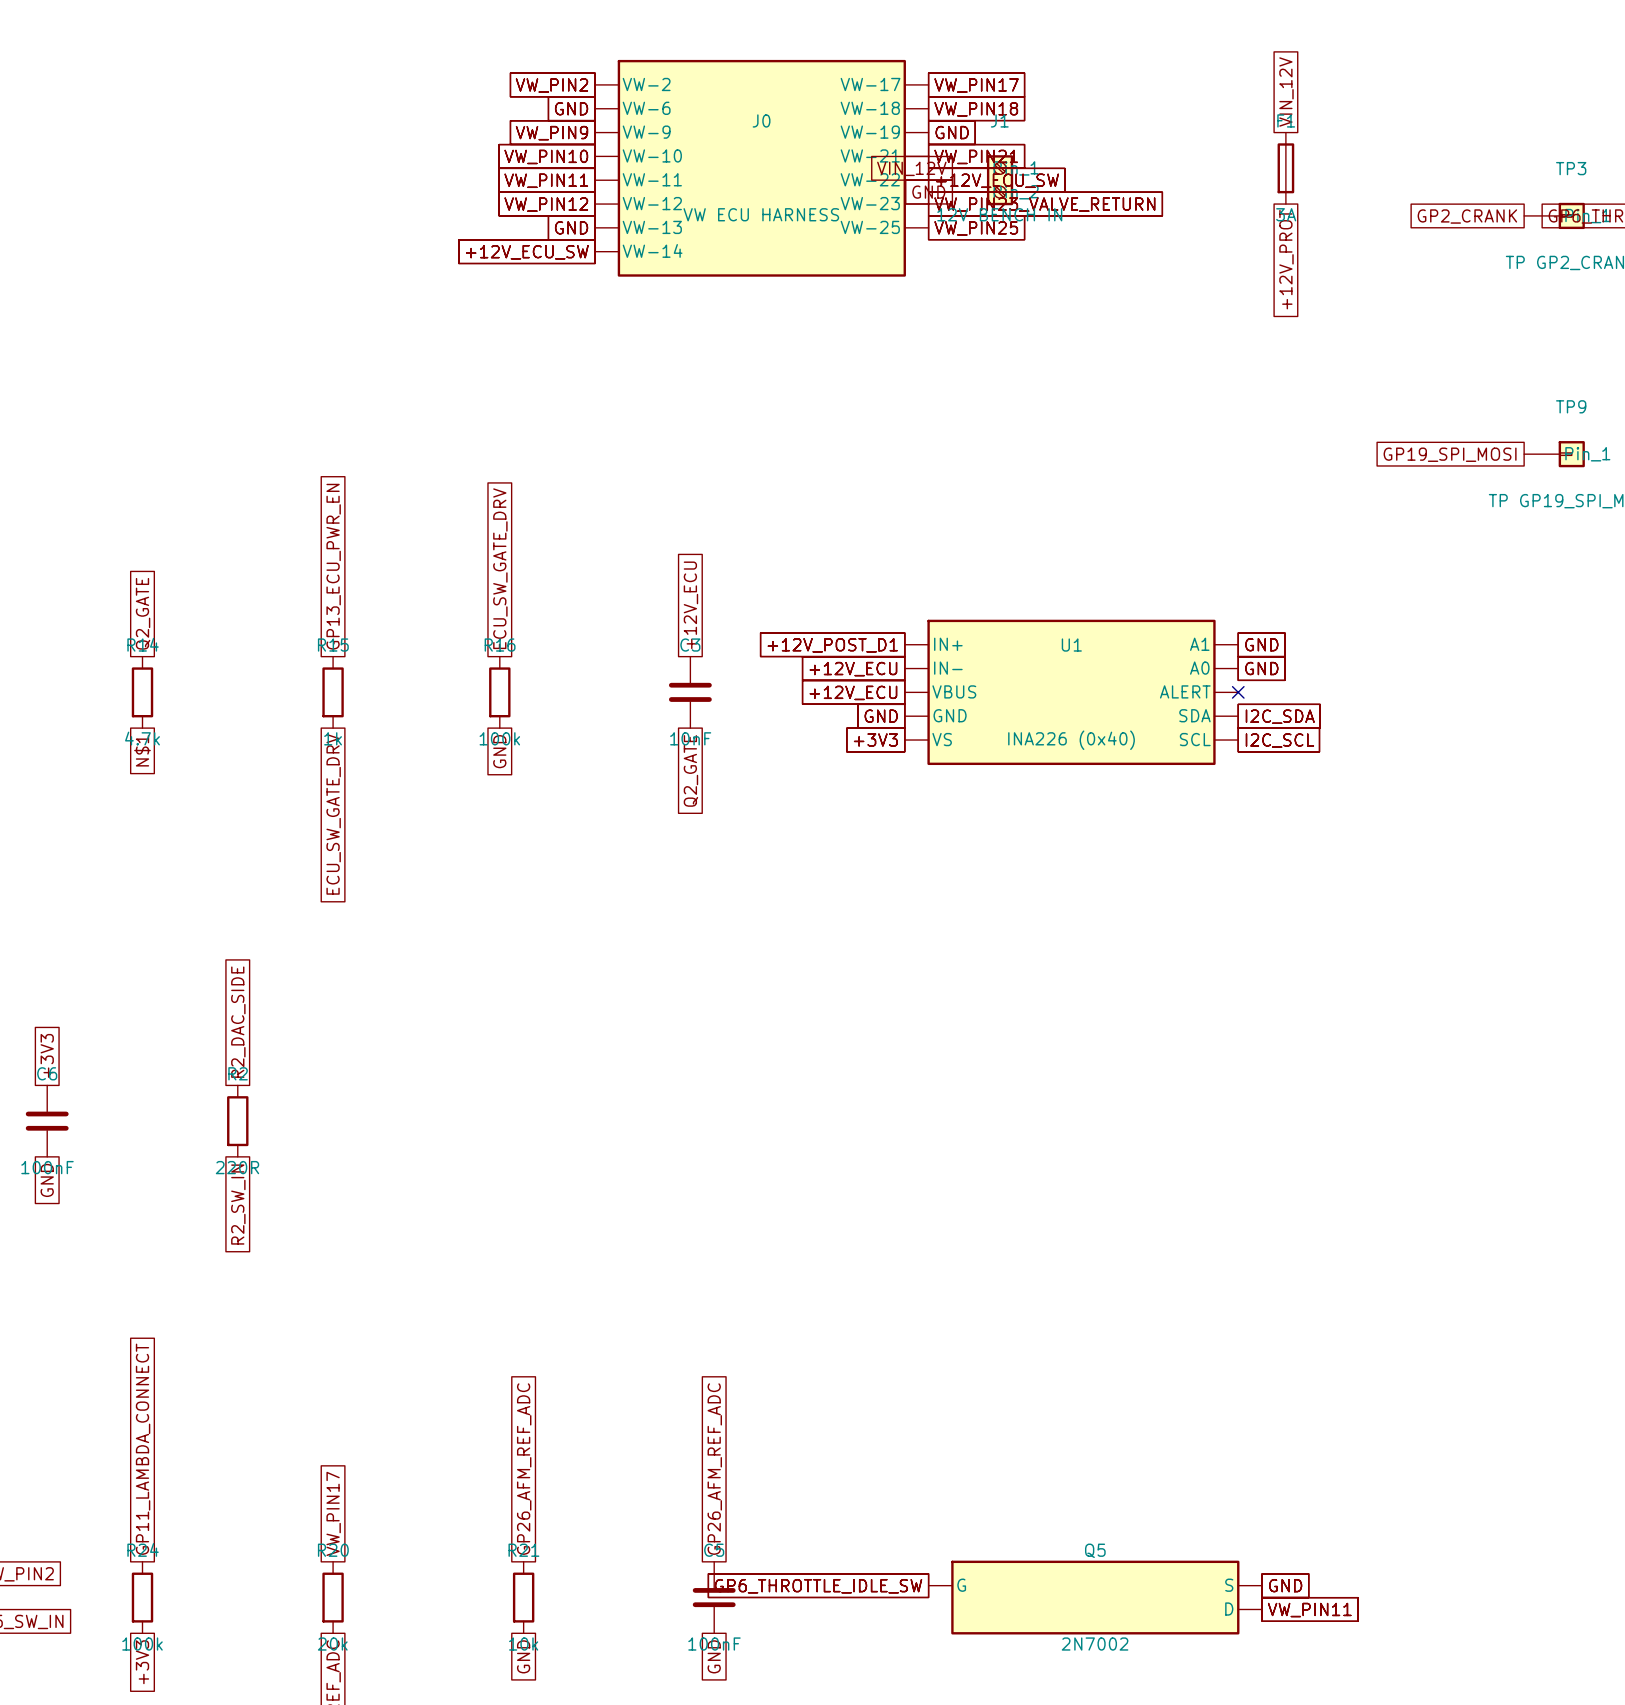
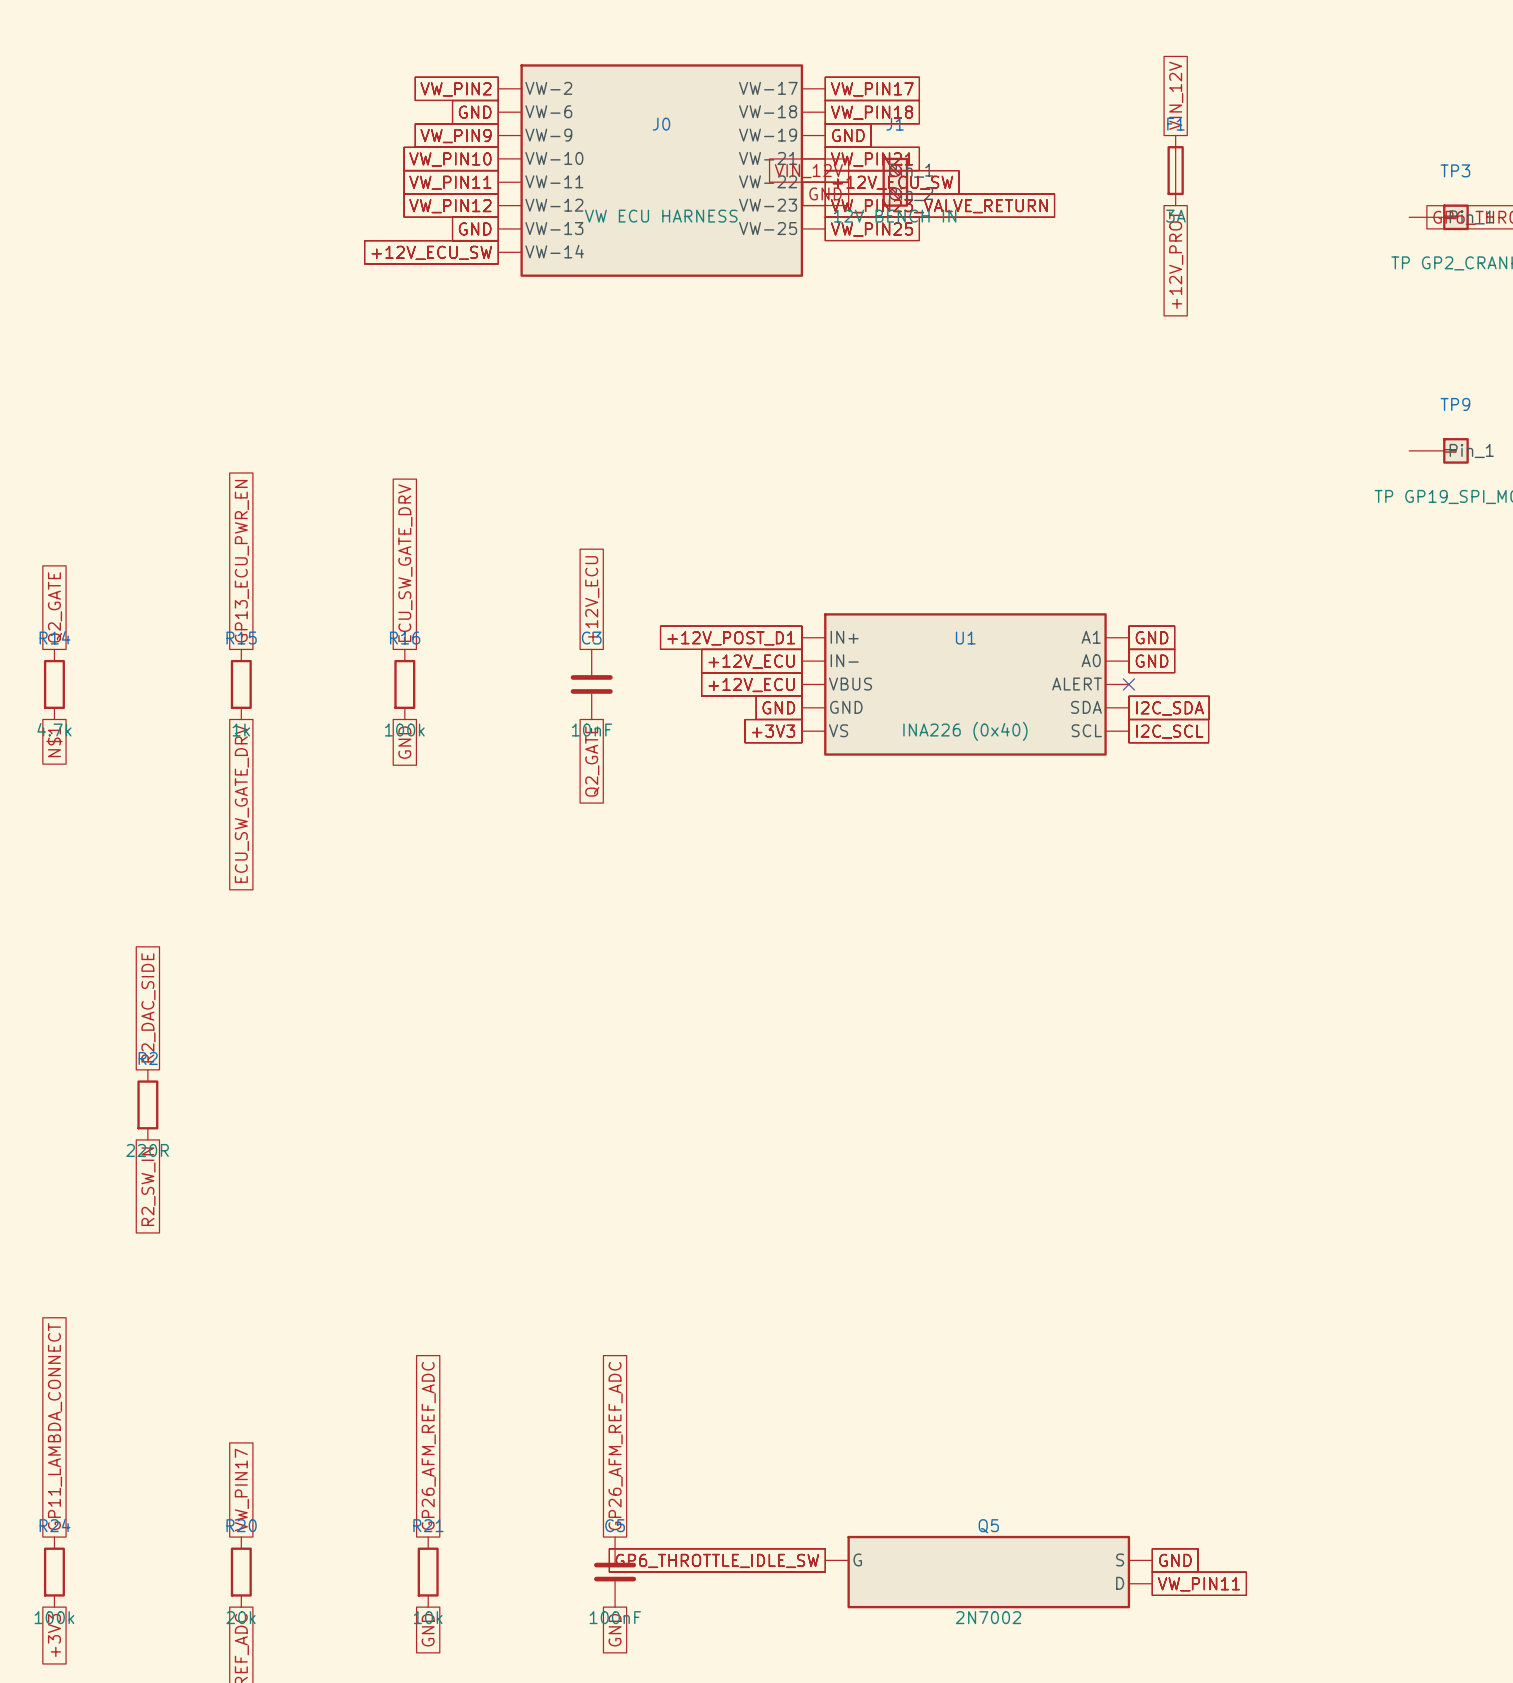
global label: GP2_CRANK (1467, 216) -> none
global label: GP19_SPI_MOSI (1450, 454) -> none

